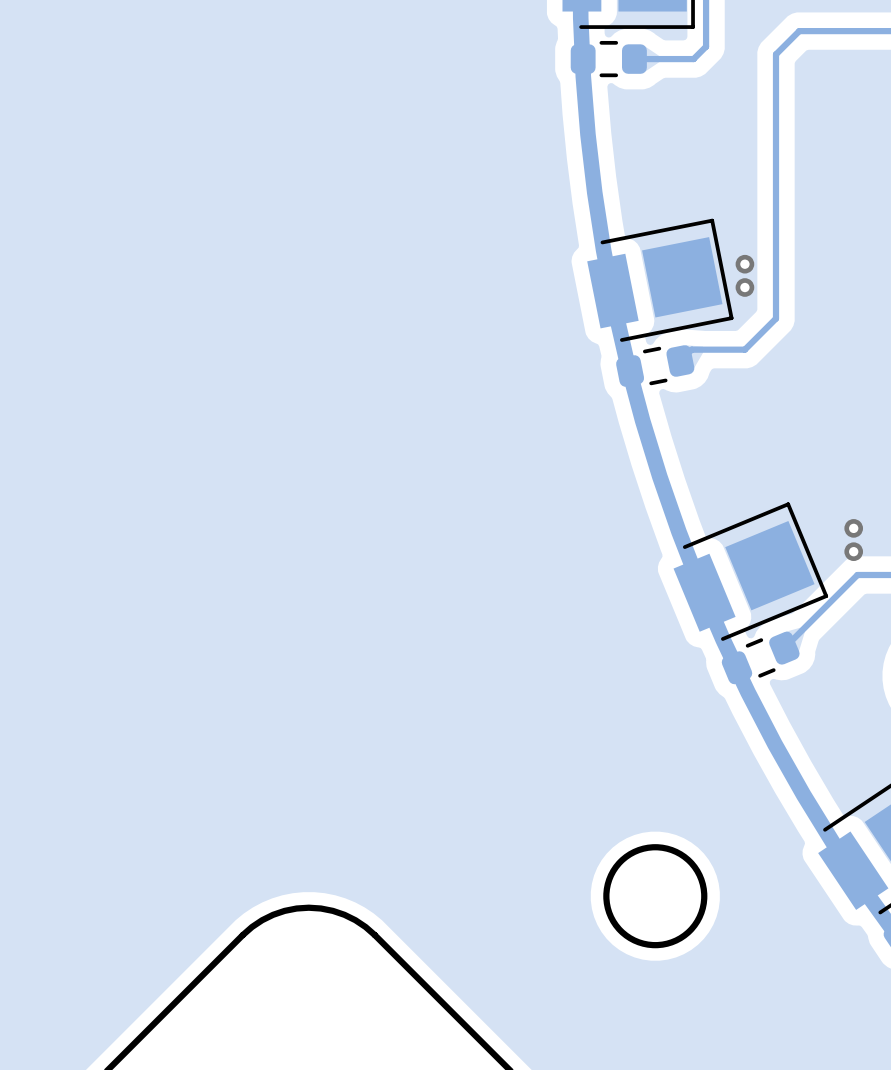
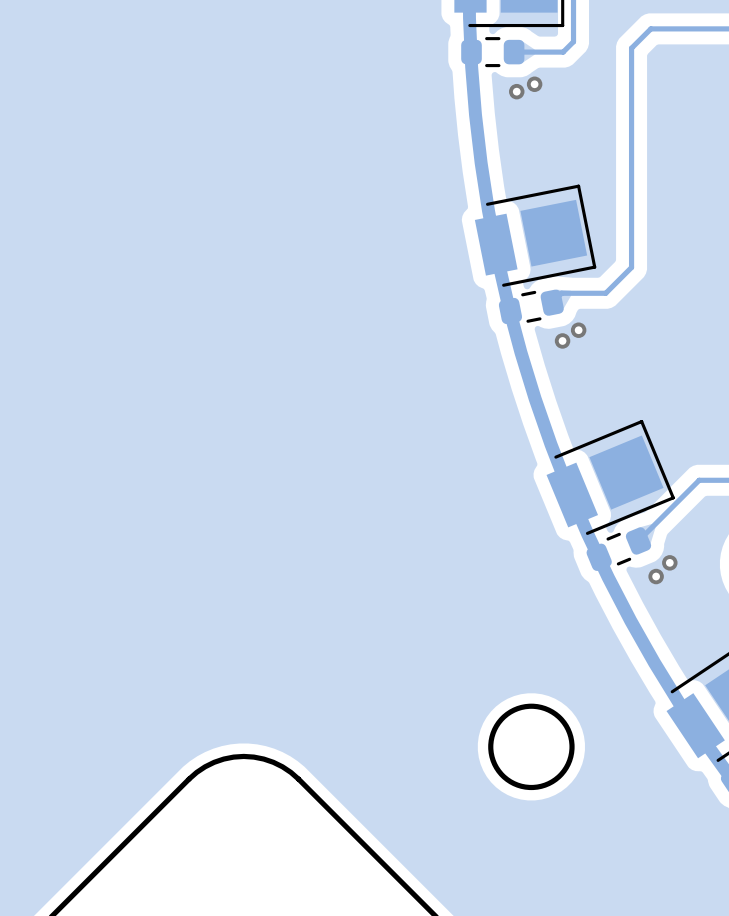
via: none -> (534, 84)
via: none -> (516, 91)
via: (744, 264) -> none
via: (744, 287) -> none
via: none -> (578, 330)
via: none -> (562, 340)
via: (853, 528) -> none
via: (853, 551) -> none
via: none -> (669, 562)
via: none -> (656, 576)

